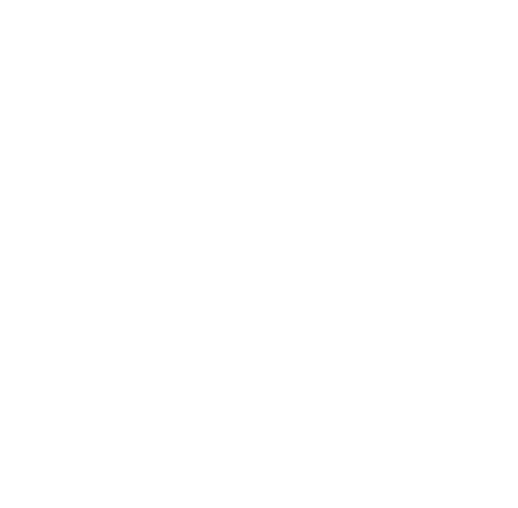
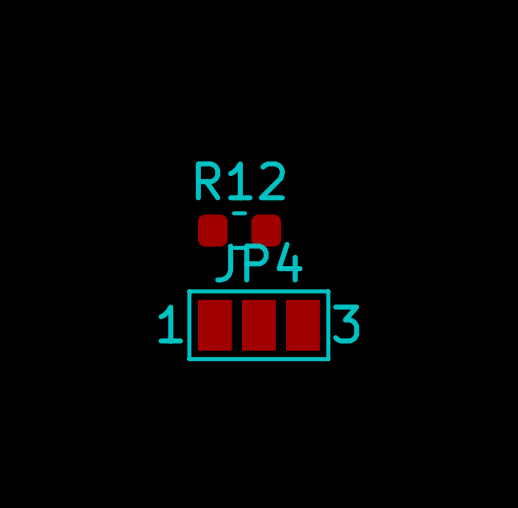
R12: none -> (239, 230)
JP4: none -> (258, 325)

